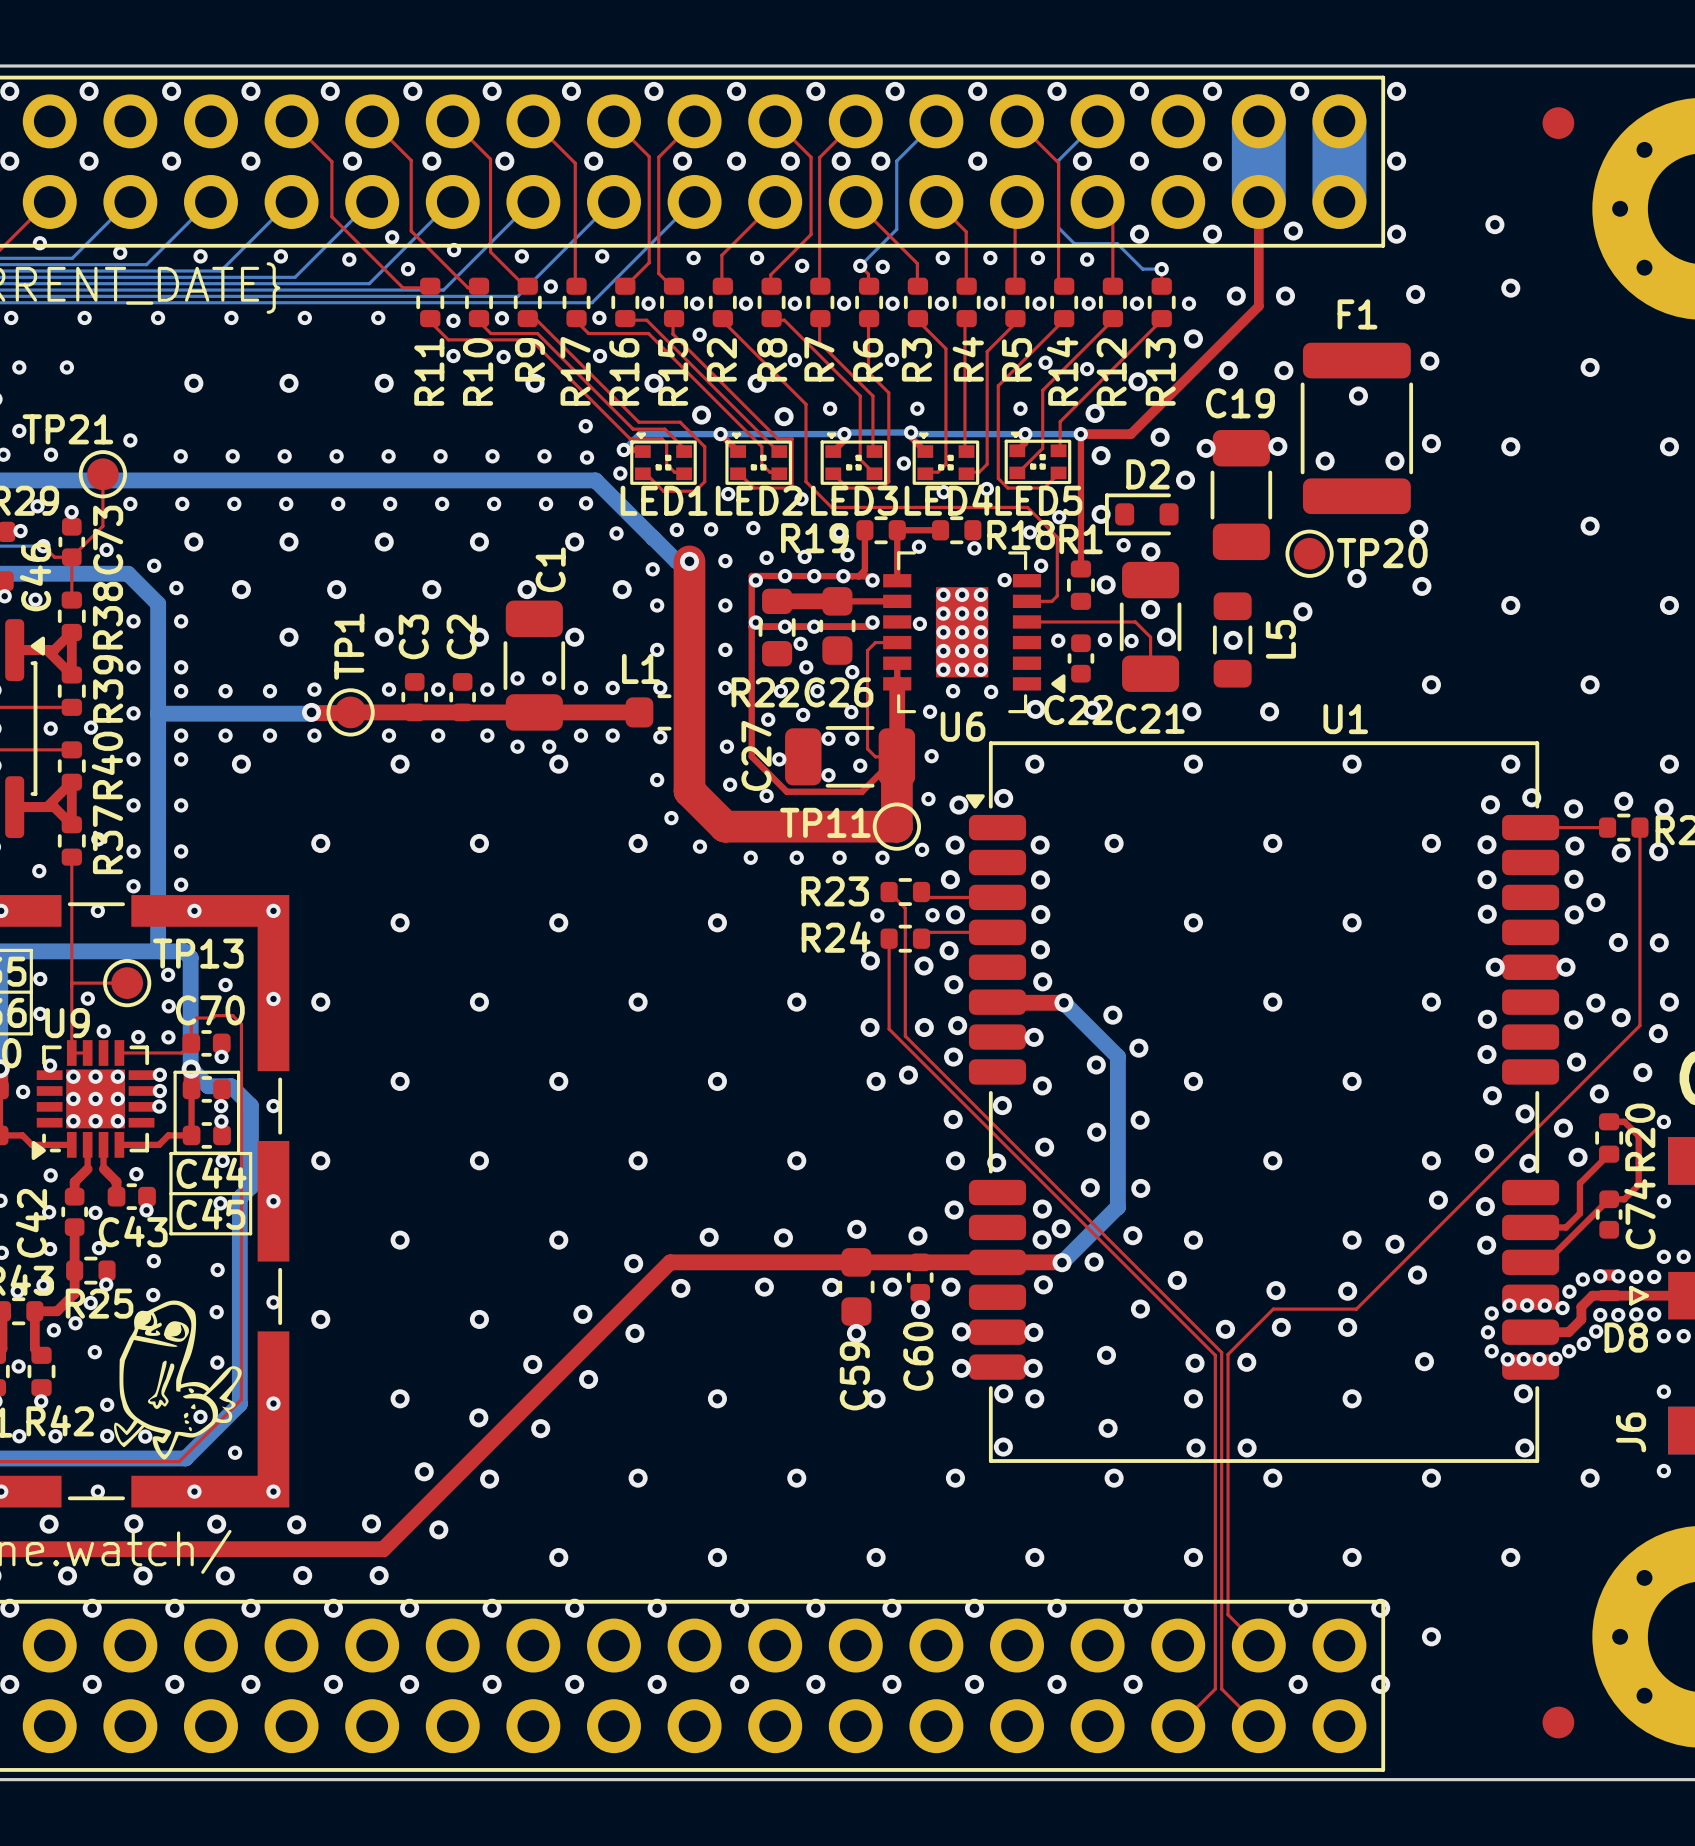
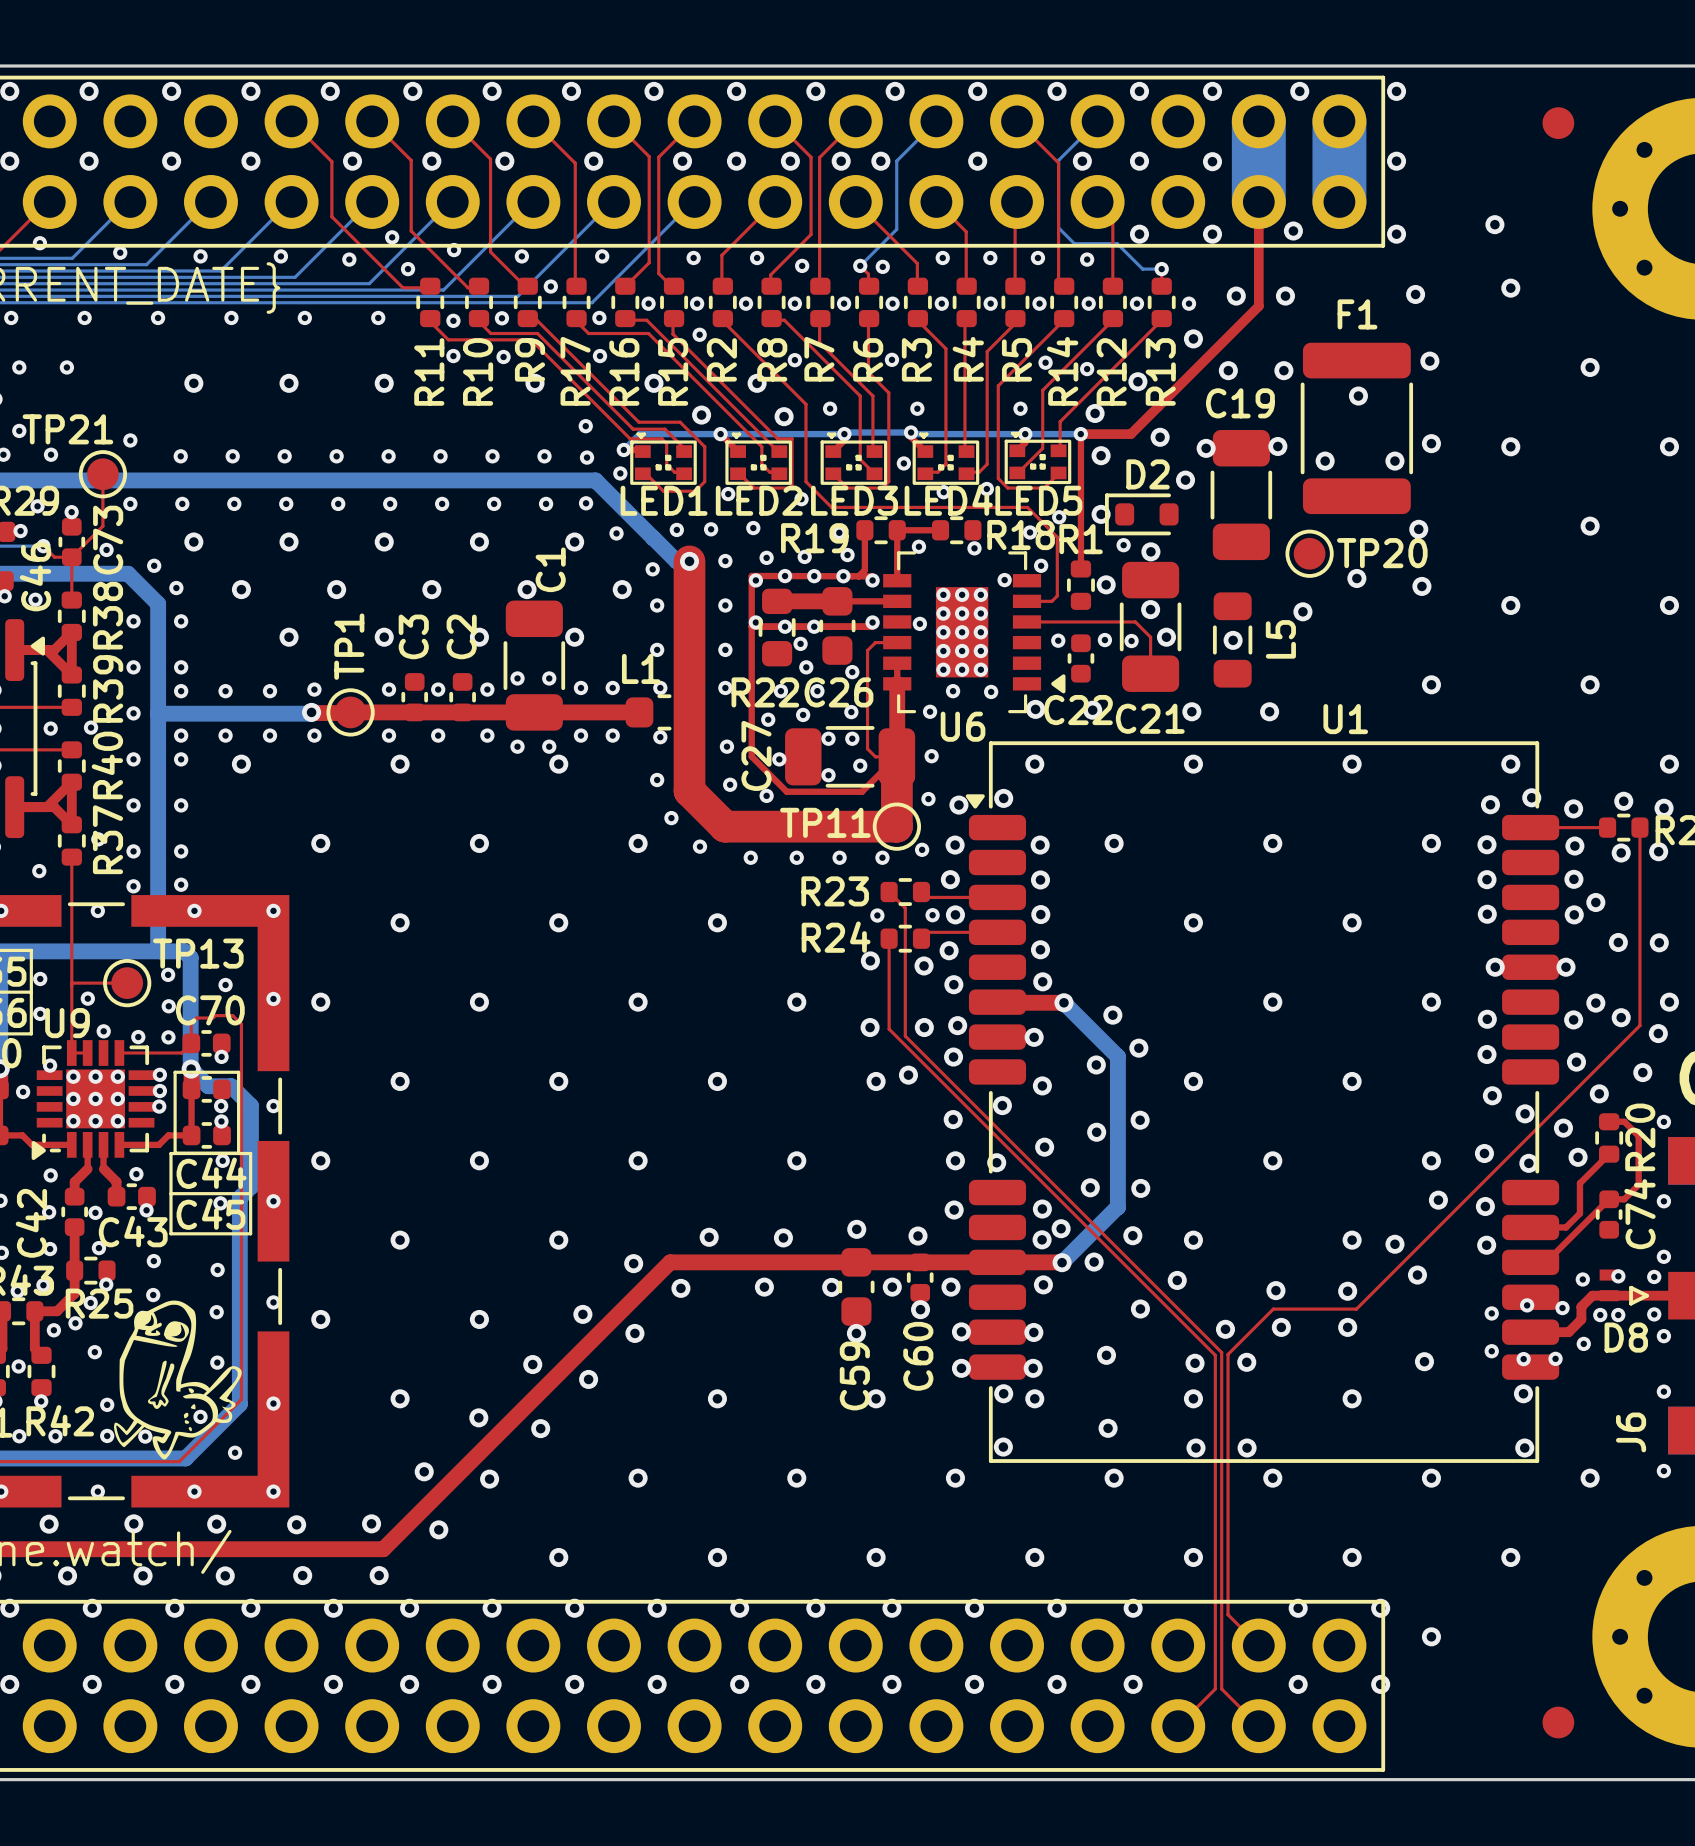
via: (1683, 1256) -> none
via: (1600, 1276) -> none
via: (1636, 1276) -> none
via: (1569, 1291) -> none
via: (1509, 1305) -> none
via: (1544, 1305) -> none
via: (1636, 1314) -> none
via: (1596, 1331) -> none
via: (1487, 1332) -> none
via: (1683, 1336) -> none
via: (1569, 1351) -> none
via: (1507, 1359) -> none
via: (1539, 1359) -> none

